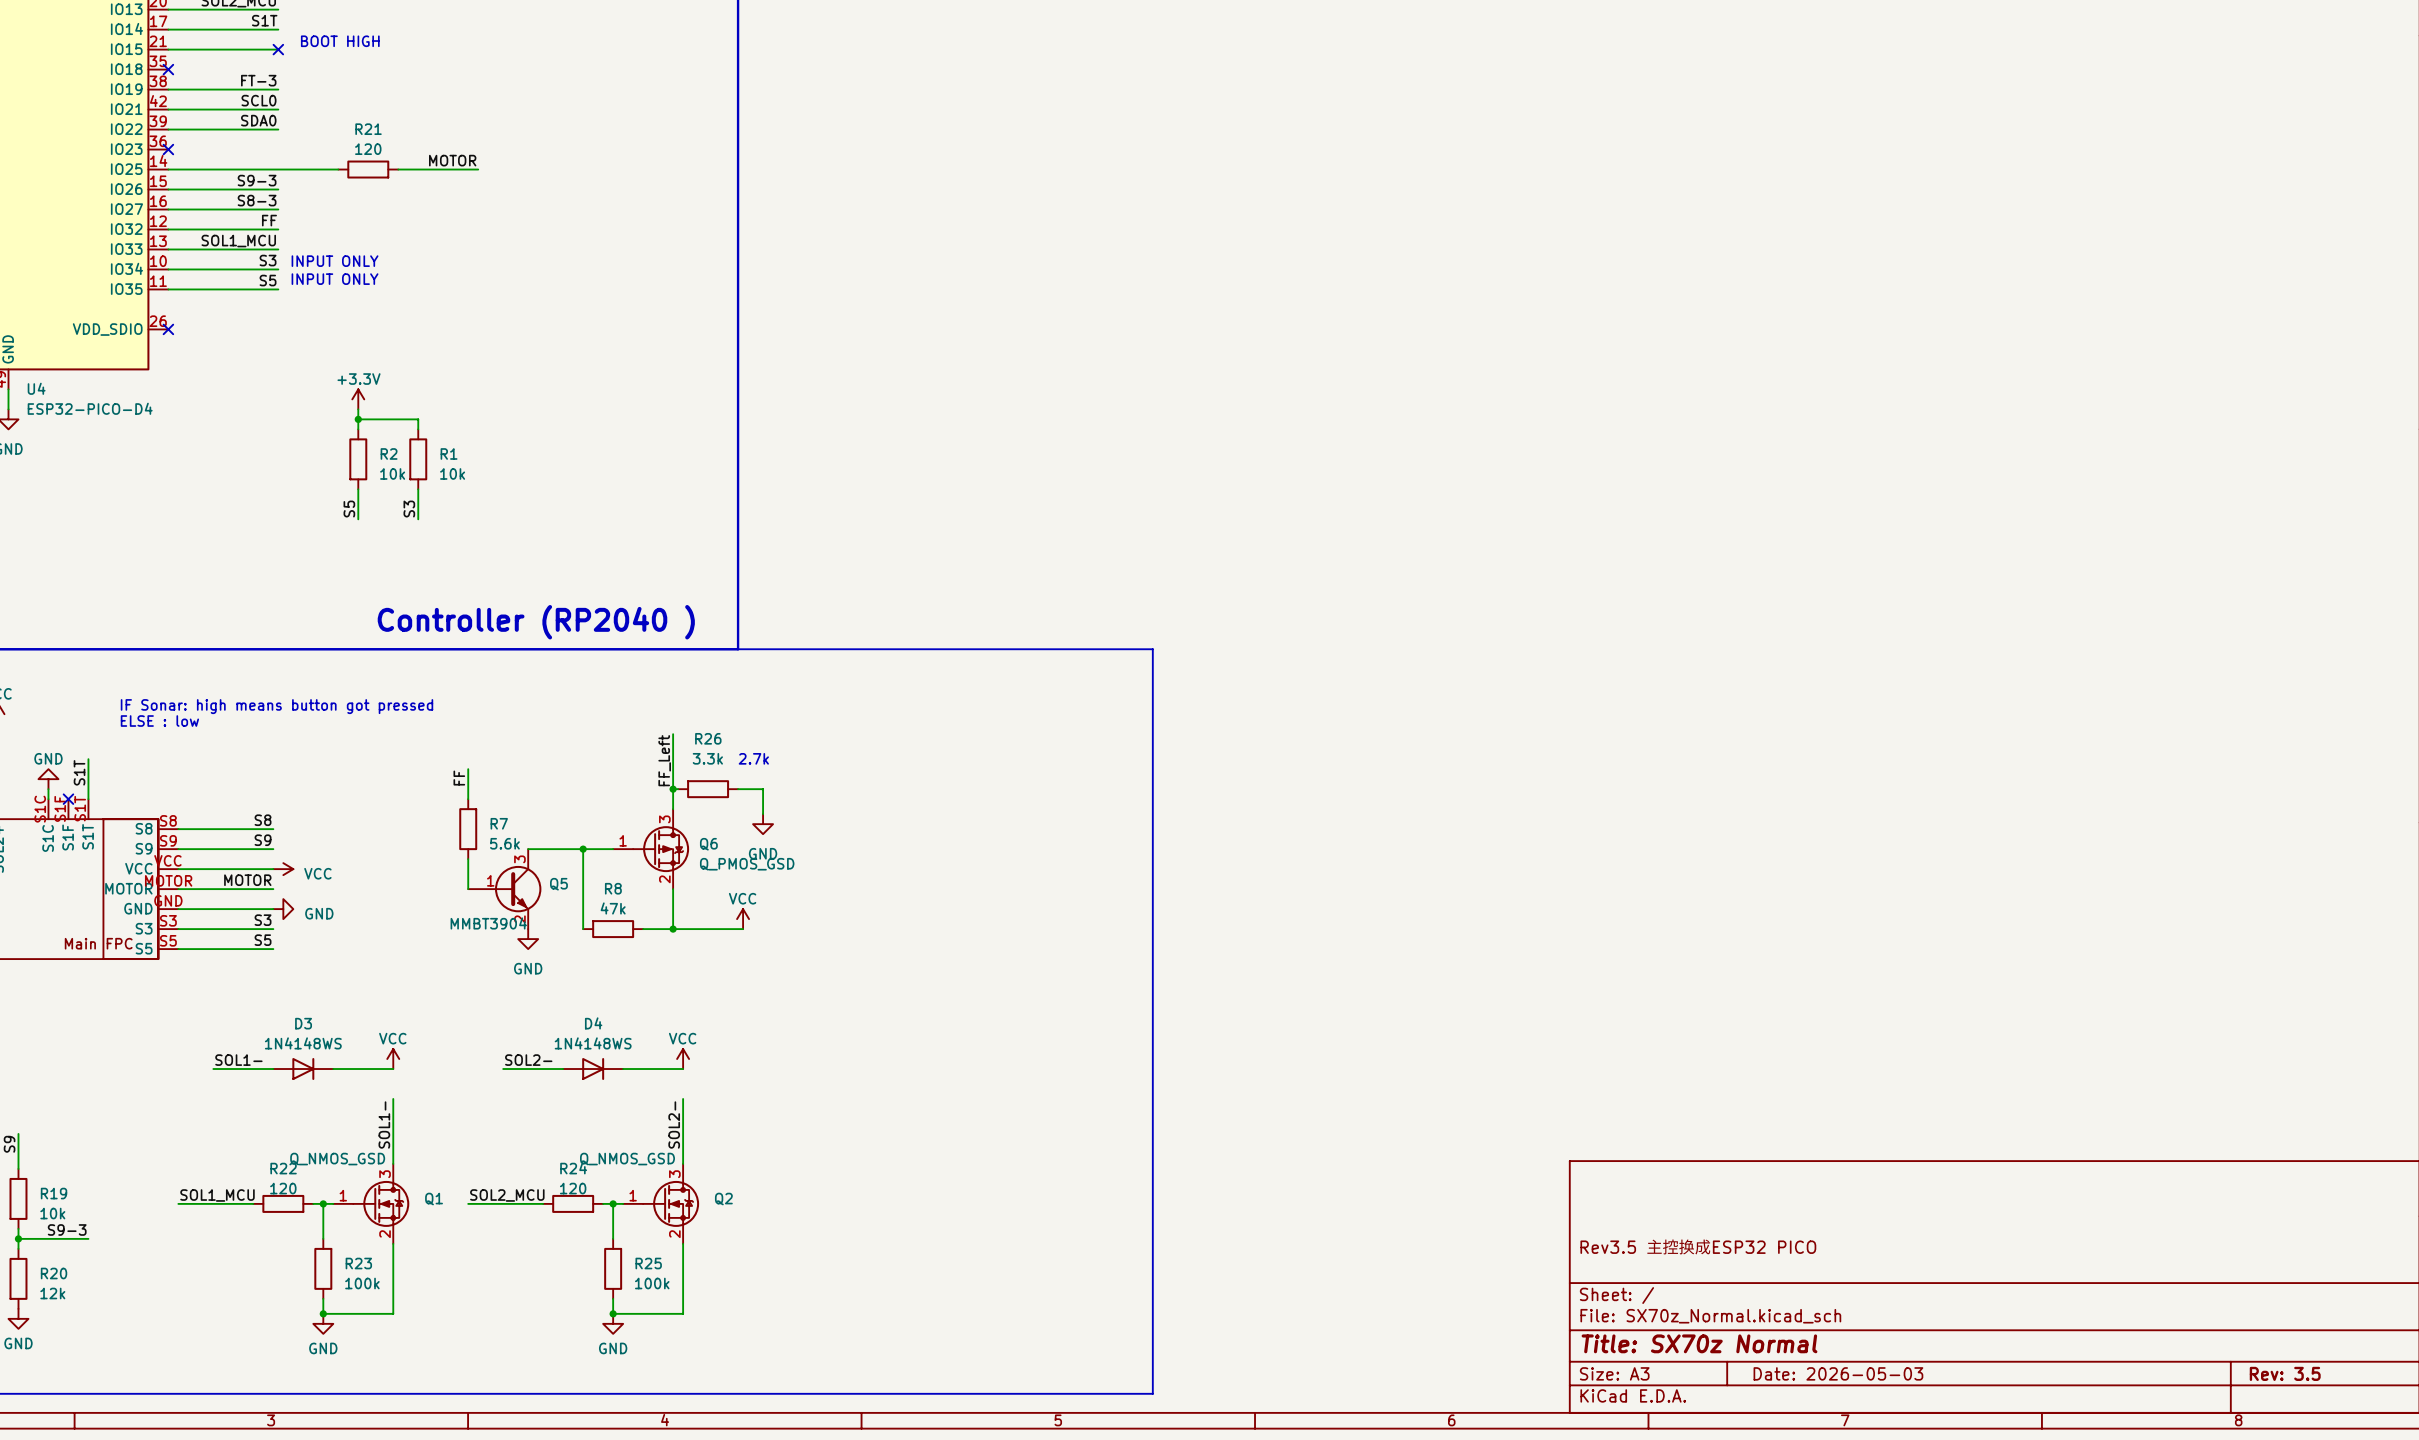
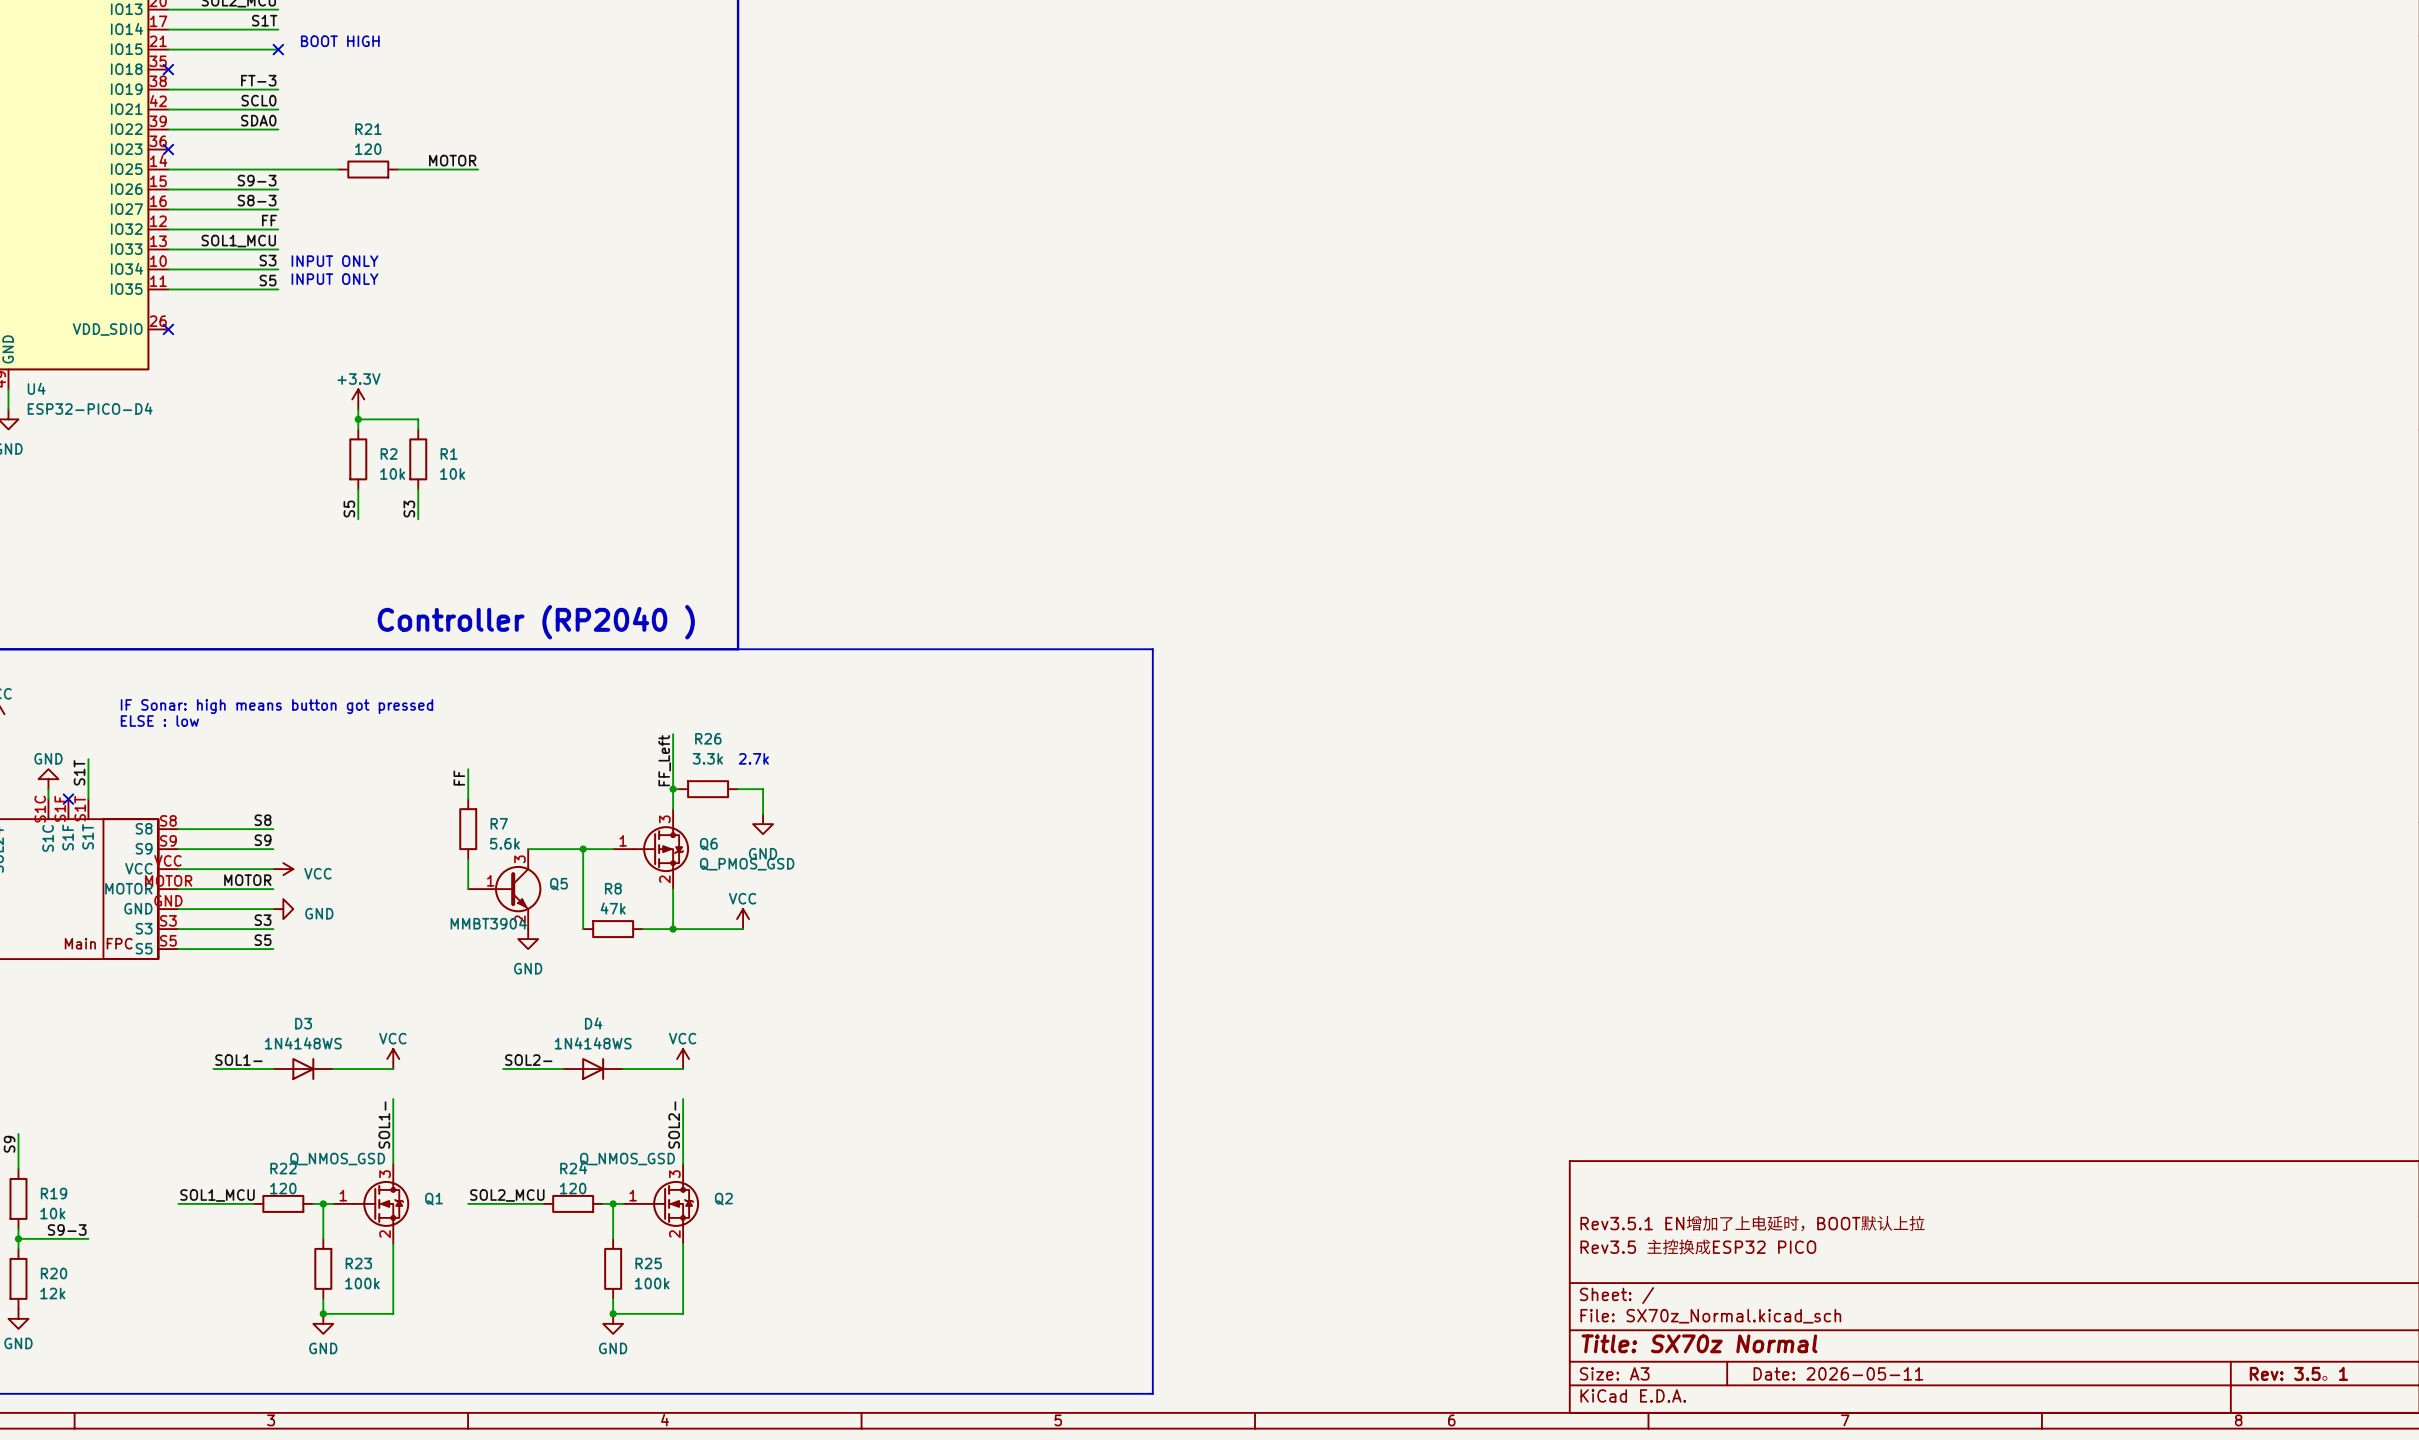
title block: none -> Rev3.5.1 EN增加了上电延时，BOOT默认上拉 (1752, 1223)
title block: Date: 2026-05-03 (1838, 1373) -> Date: 2026-05-11 (1838, 1373)
title block: Rev: 3.5 (2285, 1373) -> Rev: 3.5。1 (2298, 1374)

